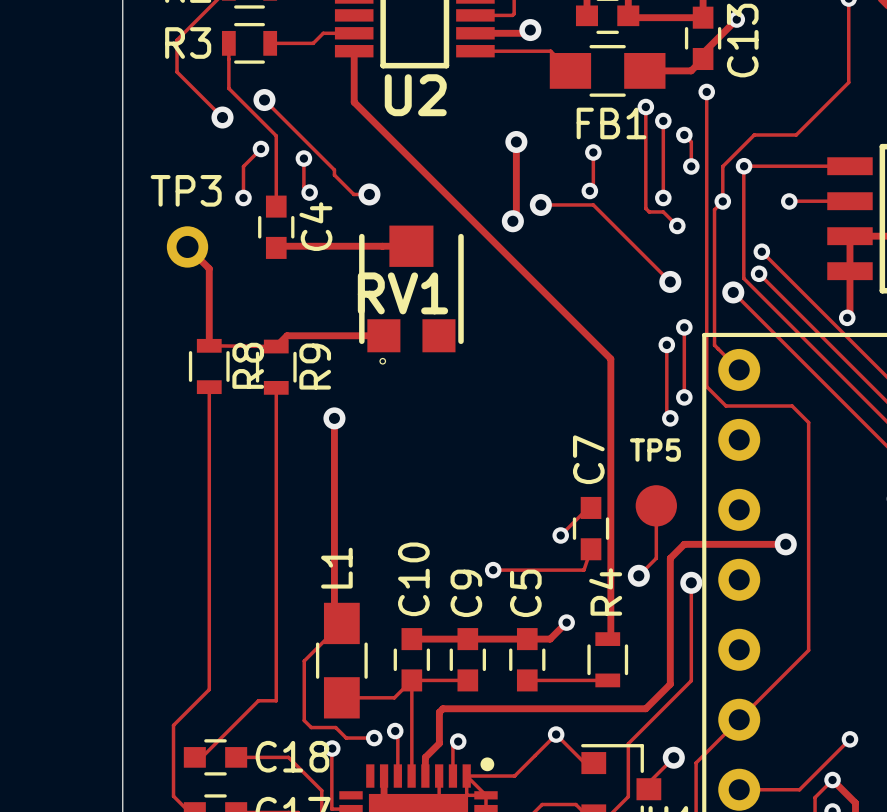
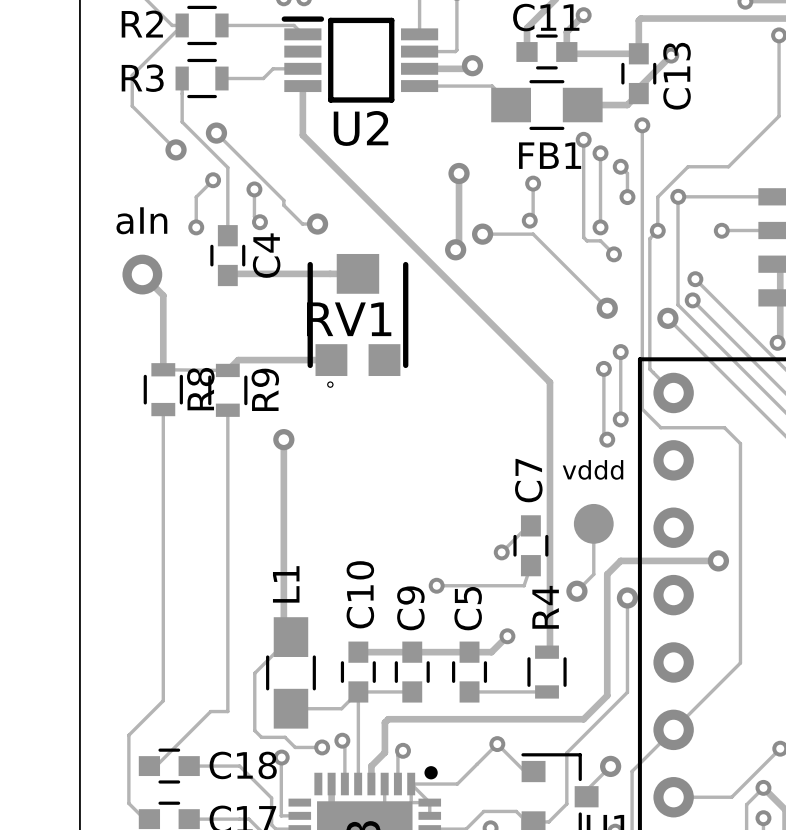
TP3 name: TP3 (186, 190) -> aIn (141, 220)
TP5 name: TP5 (655, 450) -> vddd (593, 469)

